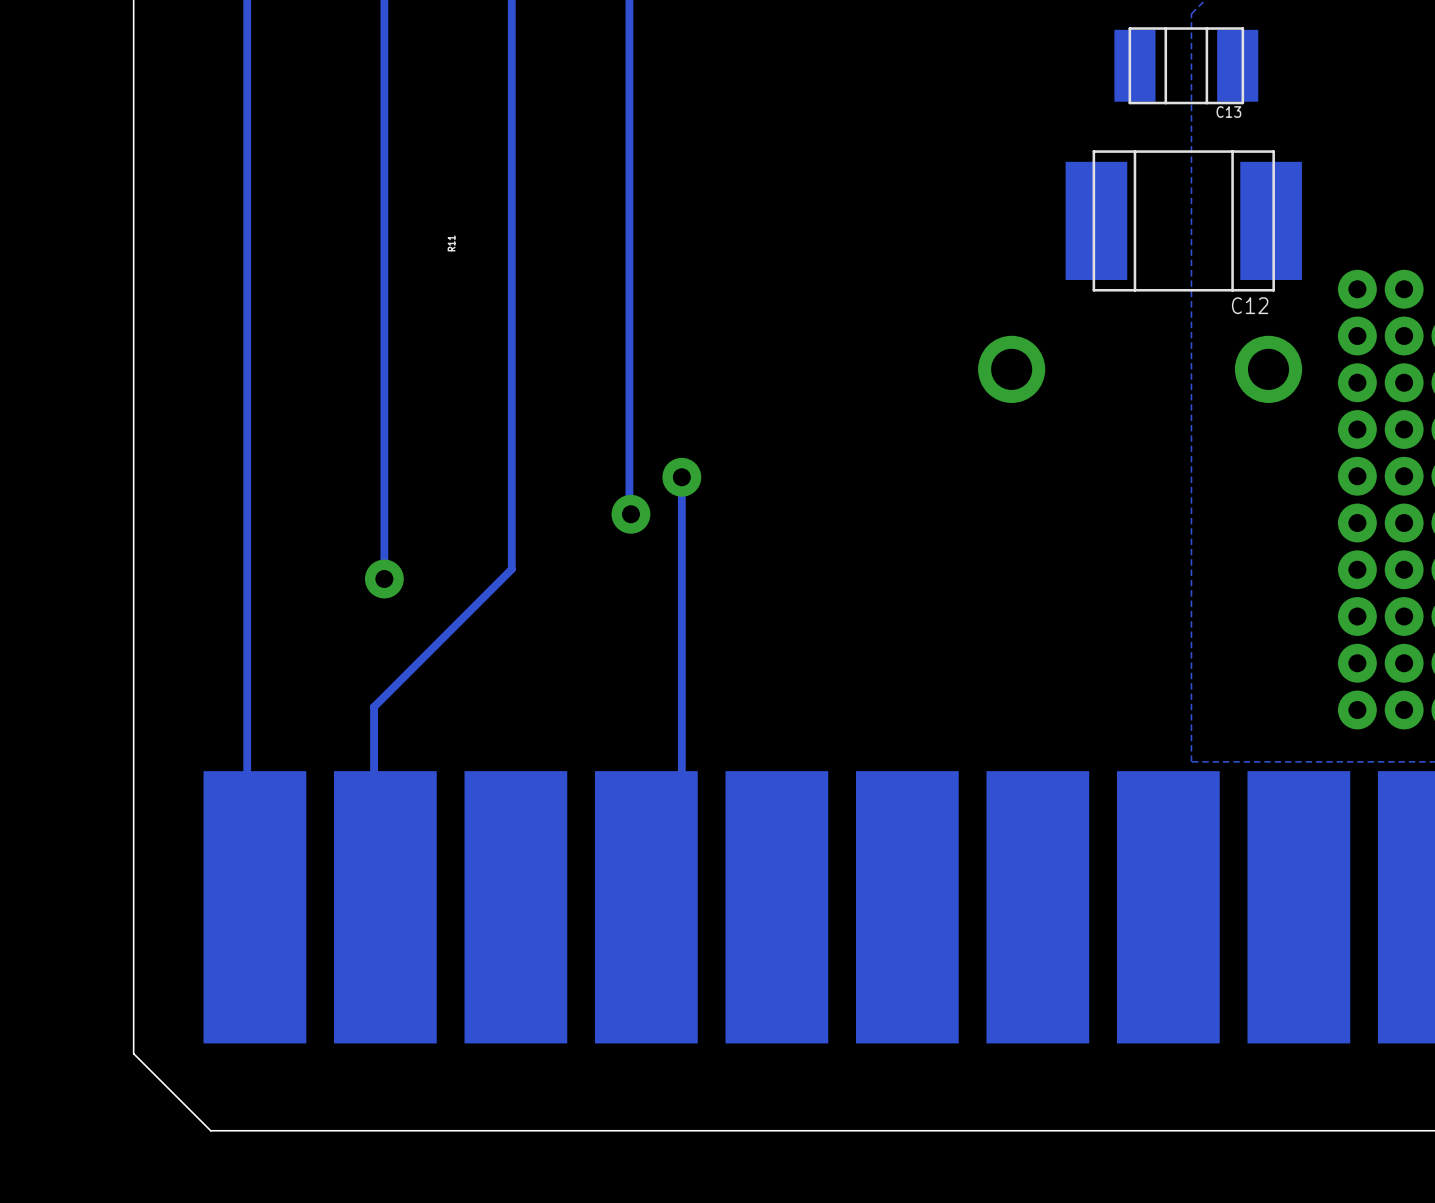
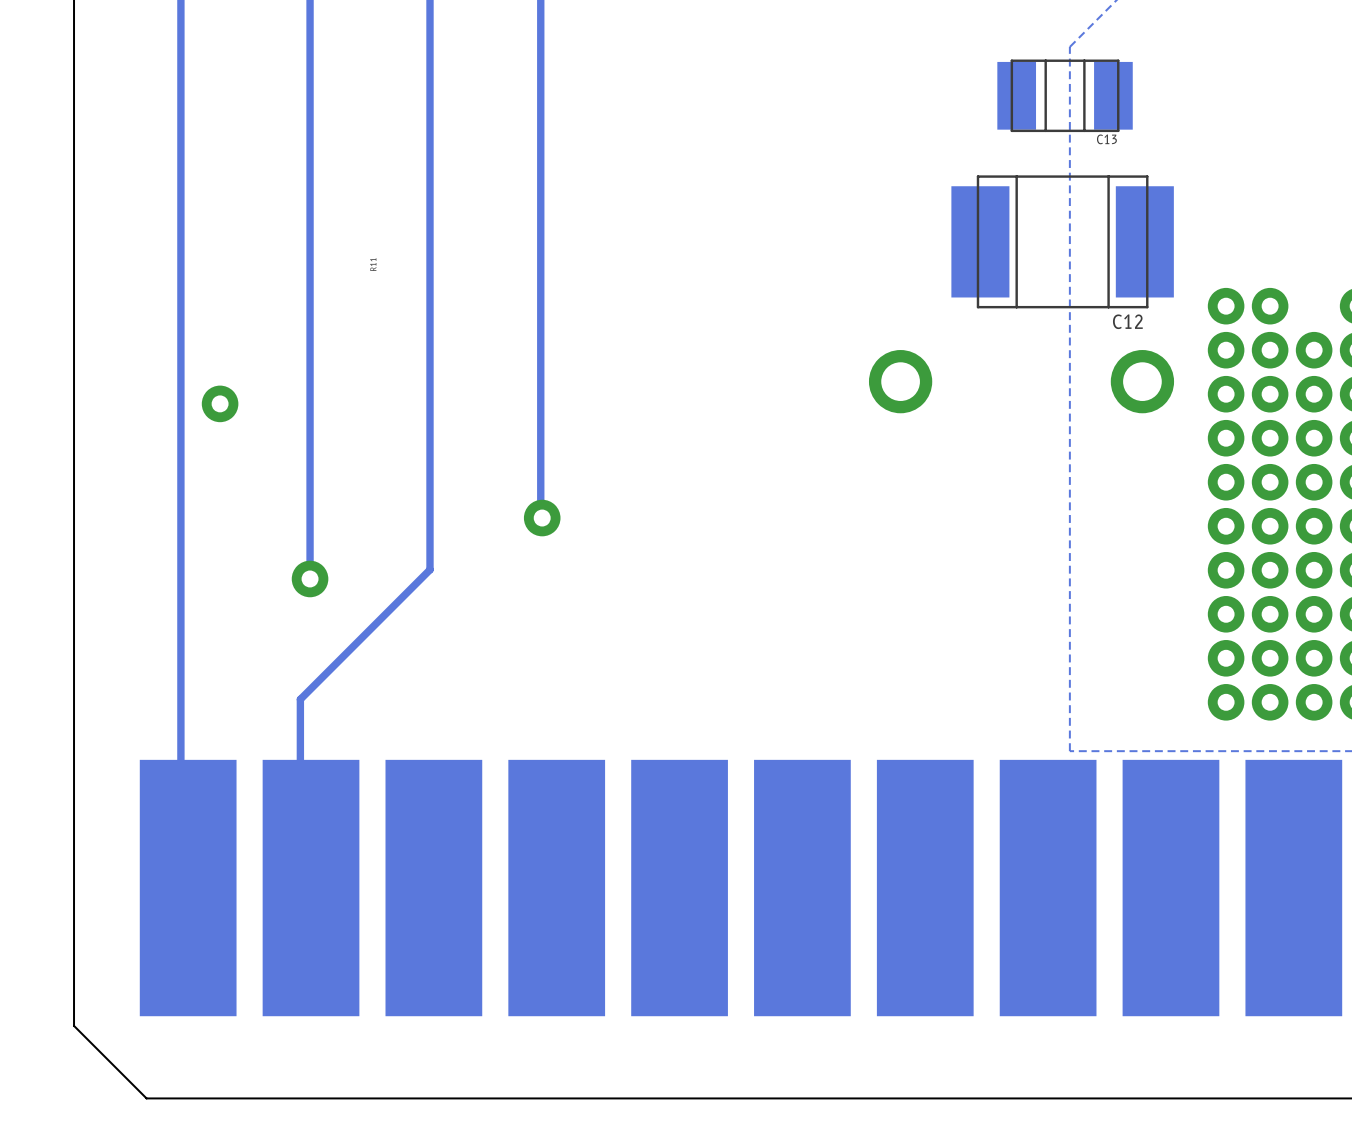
via: none -> (220, 403)
track: (681, 477) (681, 871) -> none
via: (681, 477) -> none

